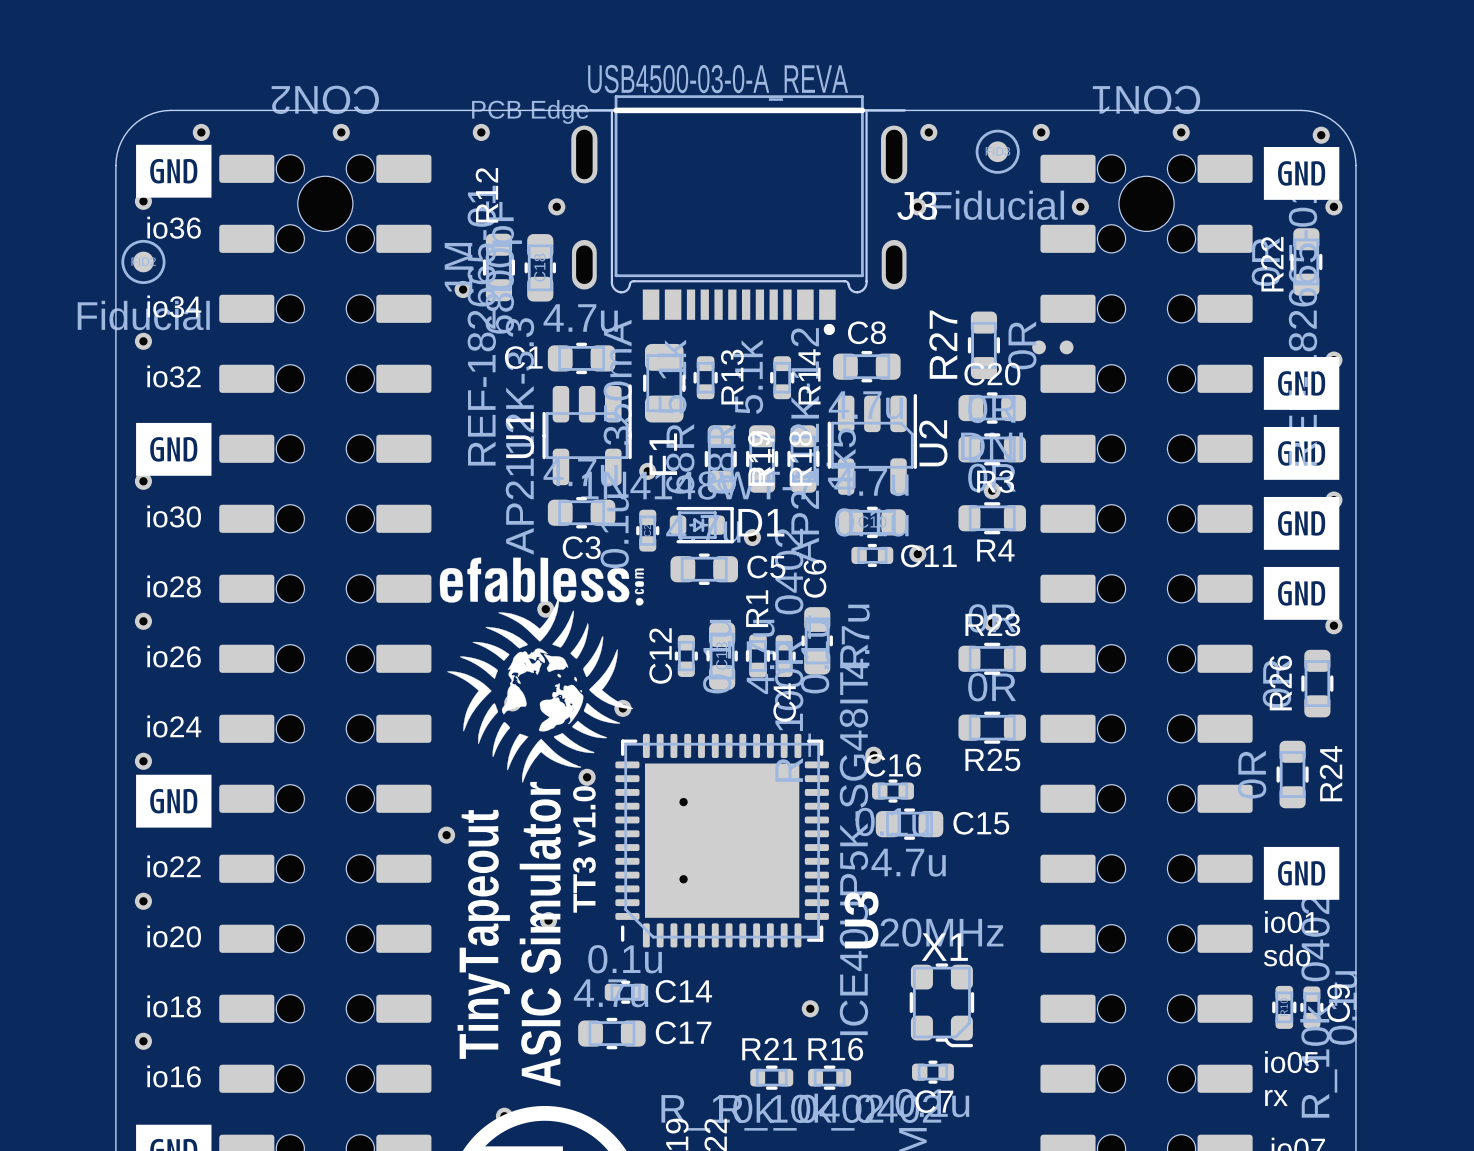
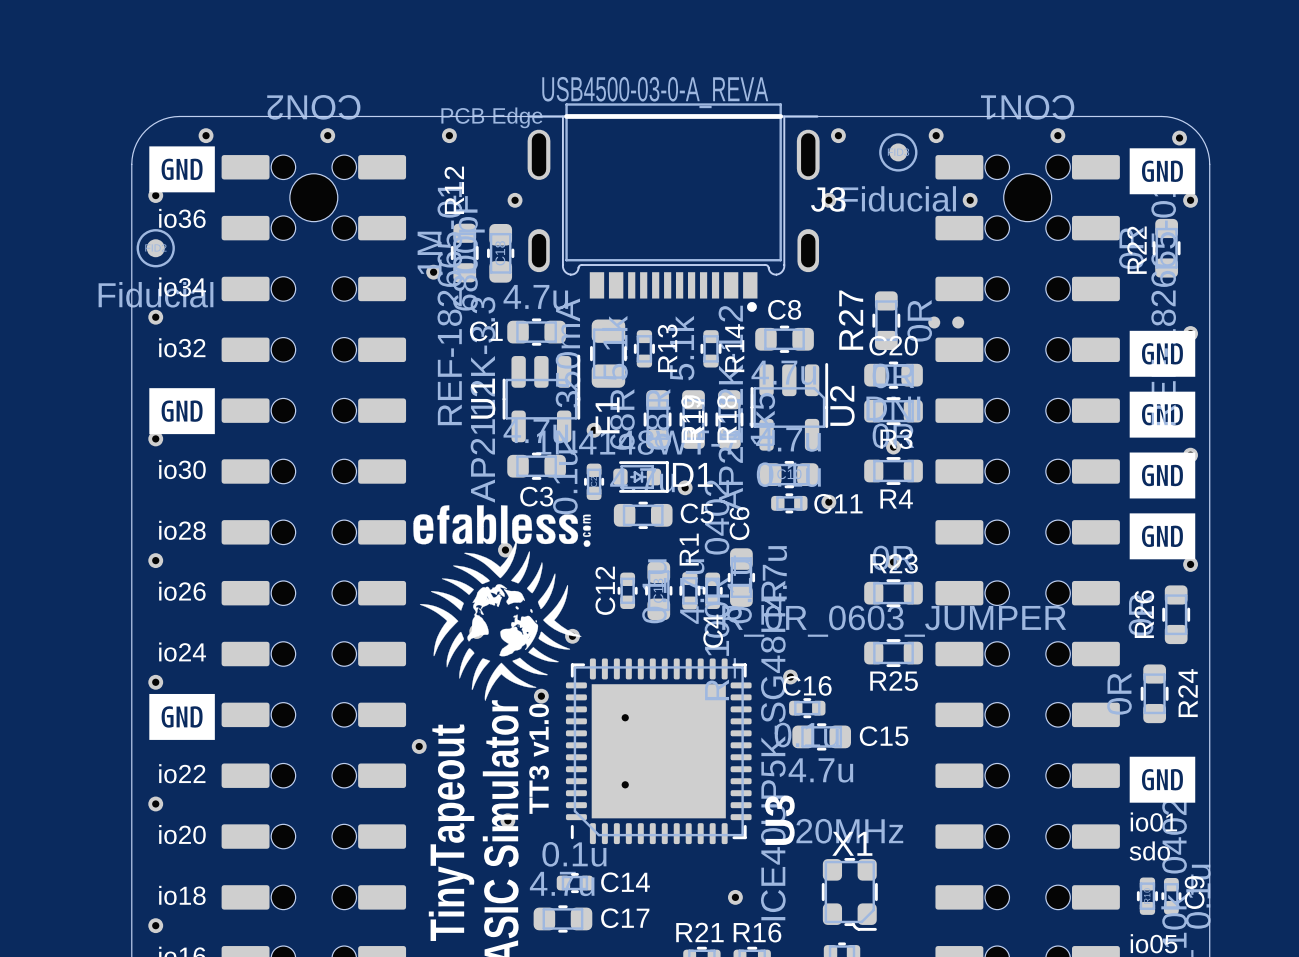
R25 value: 0R (992, 687) -> R_0R_0603_JUMPER (894, 621)

